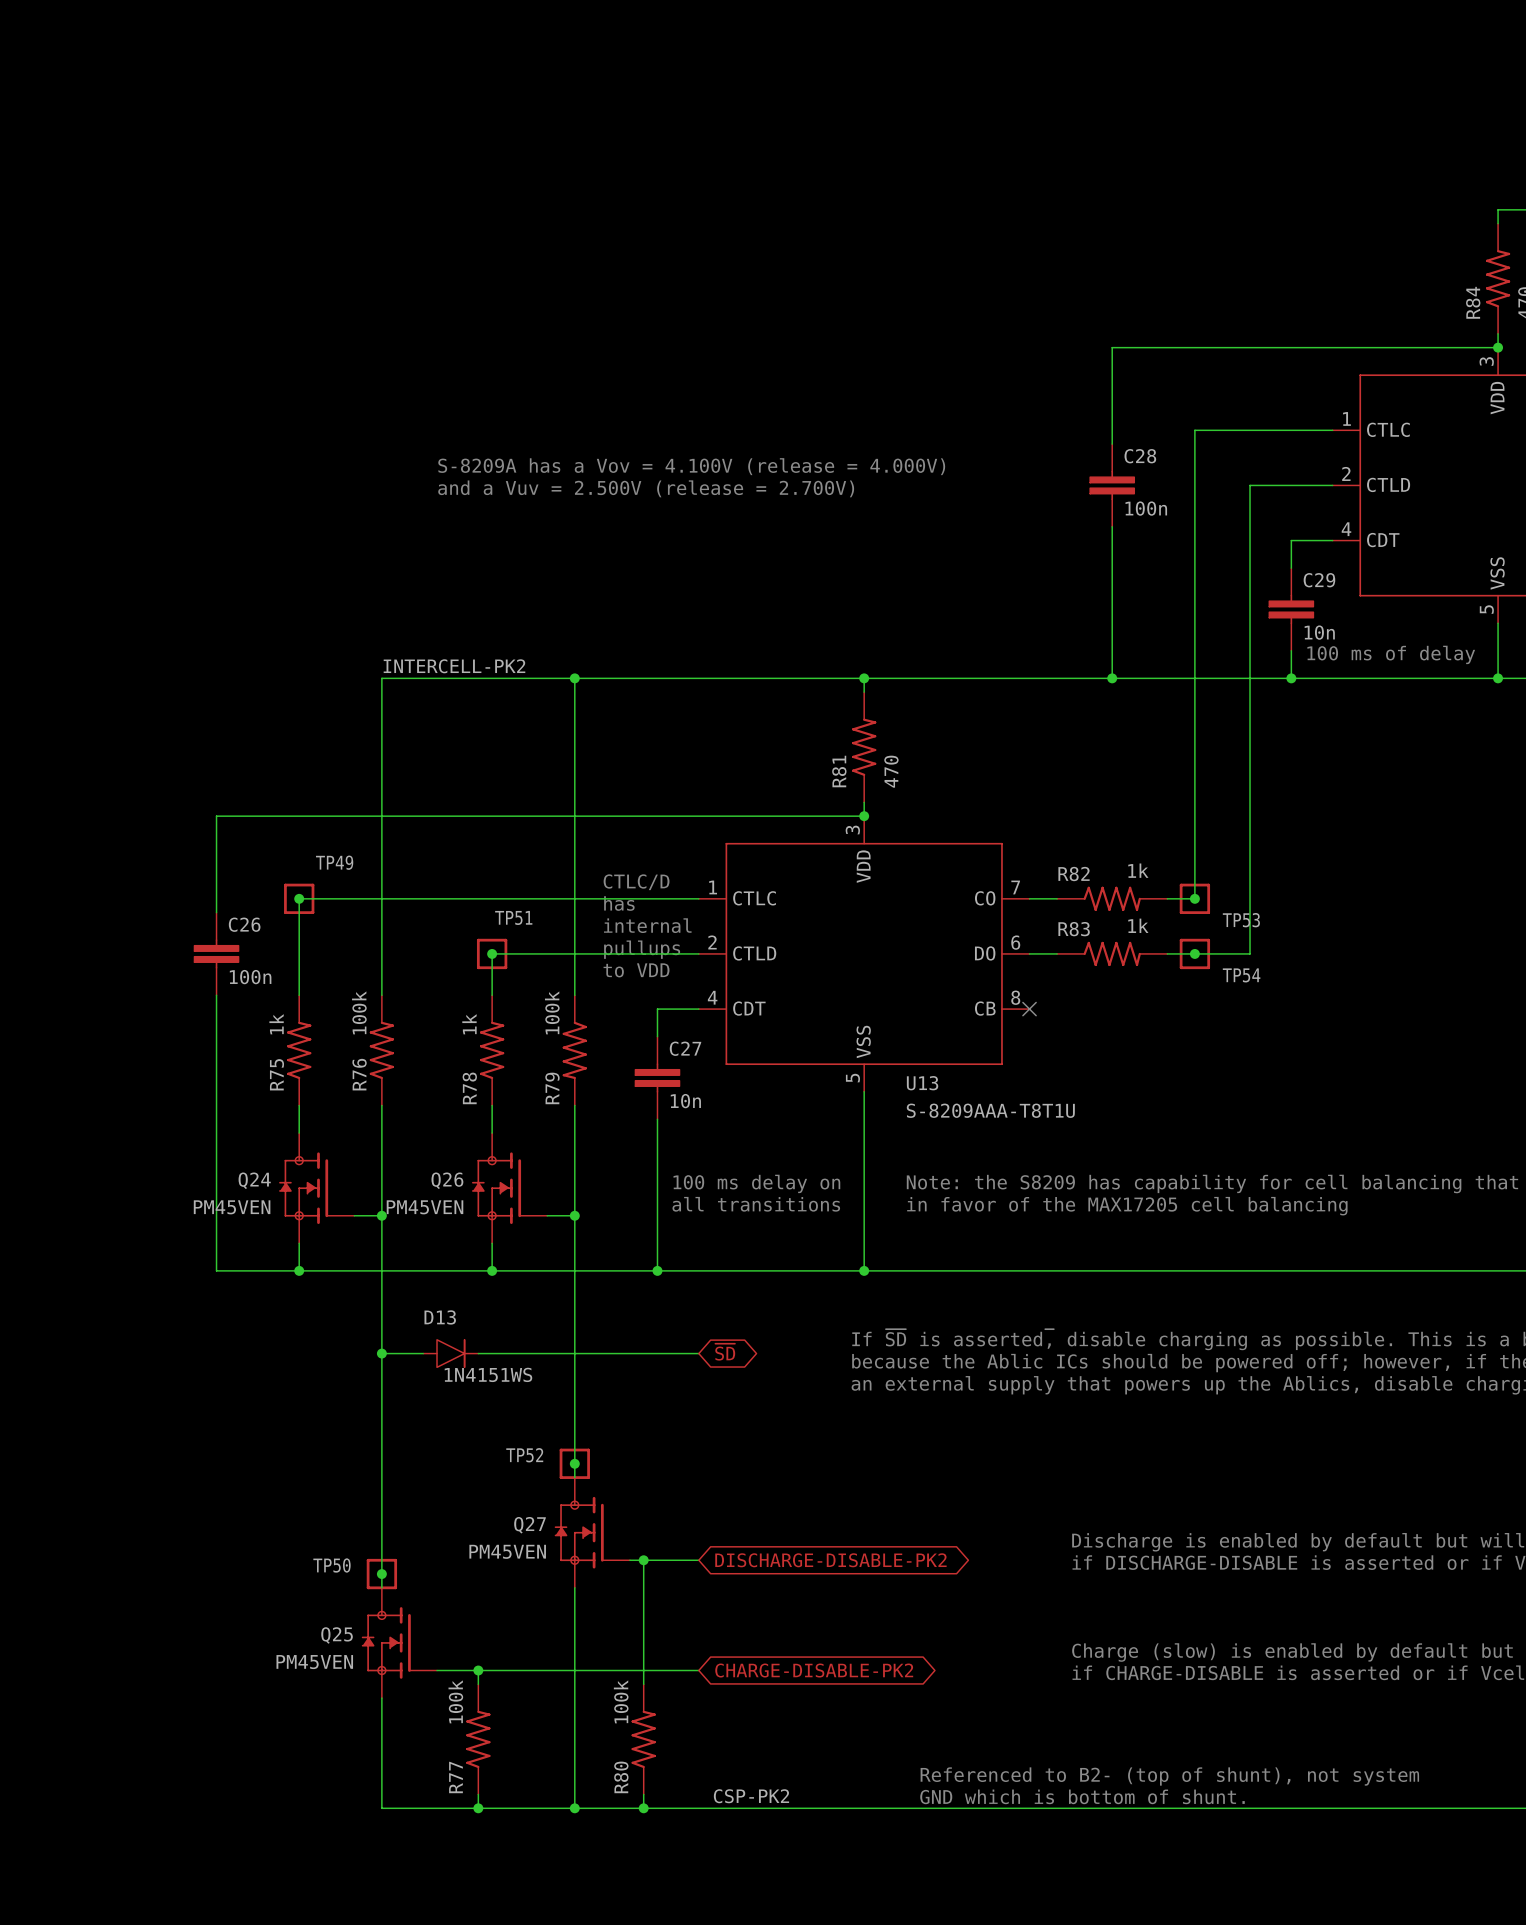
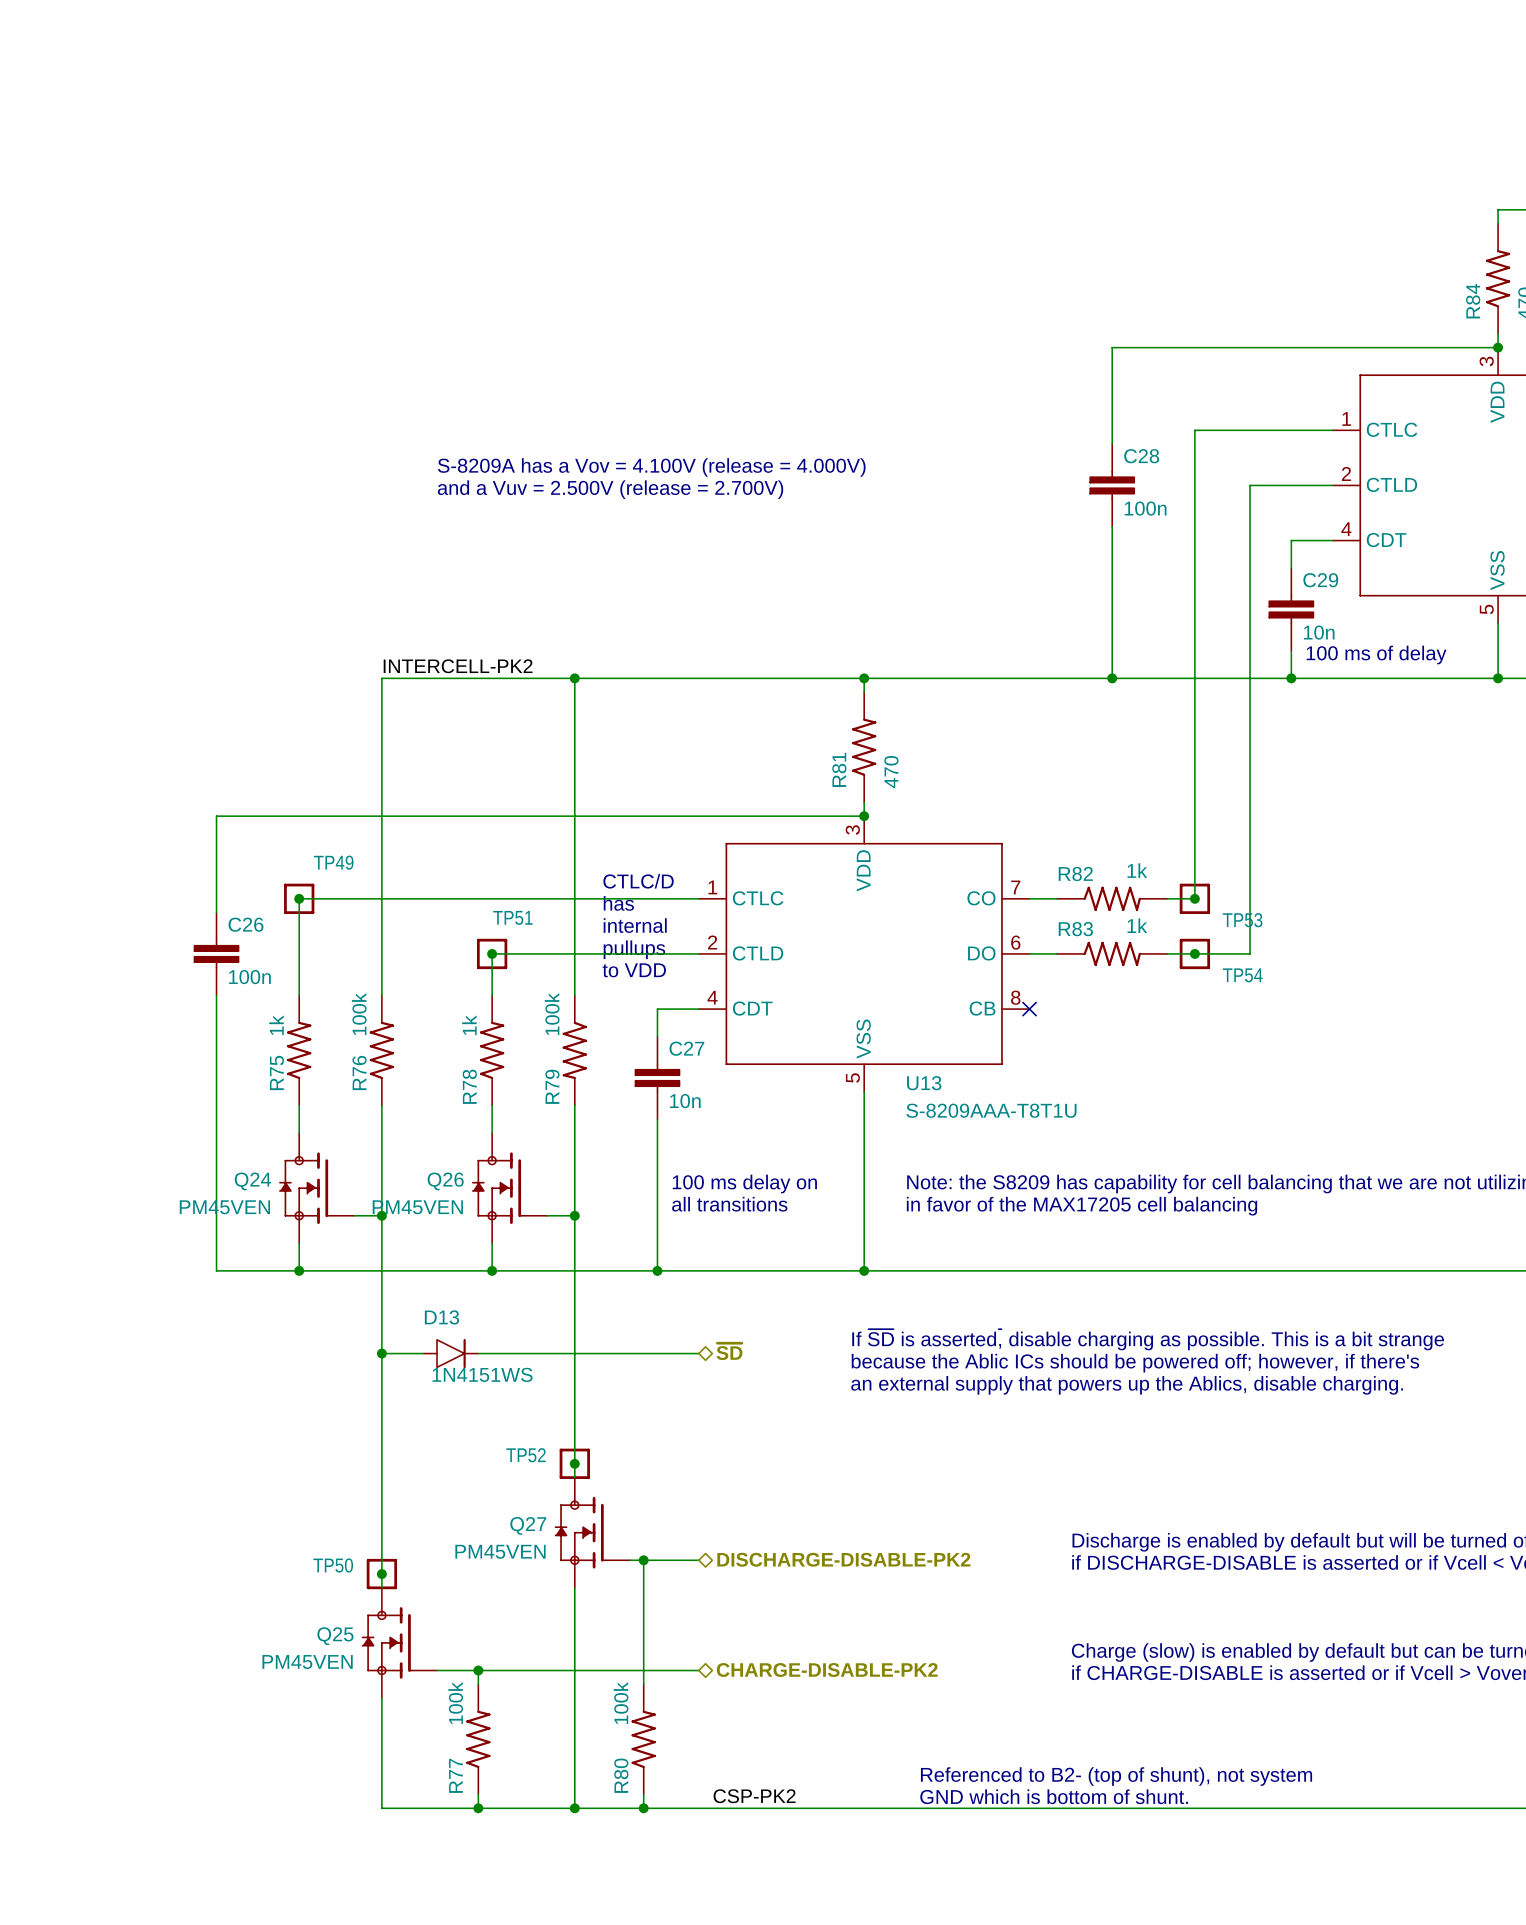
hierarchical label: none -> ~{SD} (729, 1351)
global label: ~{SD} (725, 1352) -> none
hierarchical label: none -> DISCHARGE-DISABLE-PK2 (843, 1559)
global label: DISCHARGE-DISABLE-PK2 (830, 1560) -> none
global label: CHARGE-DISABLE-PK2 (814, 1670) -> none
hierarchical label: none -> CHARGE-DISABLE-PK2 (827, 1670)

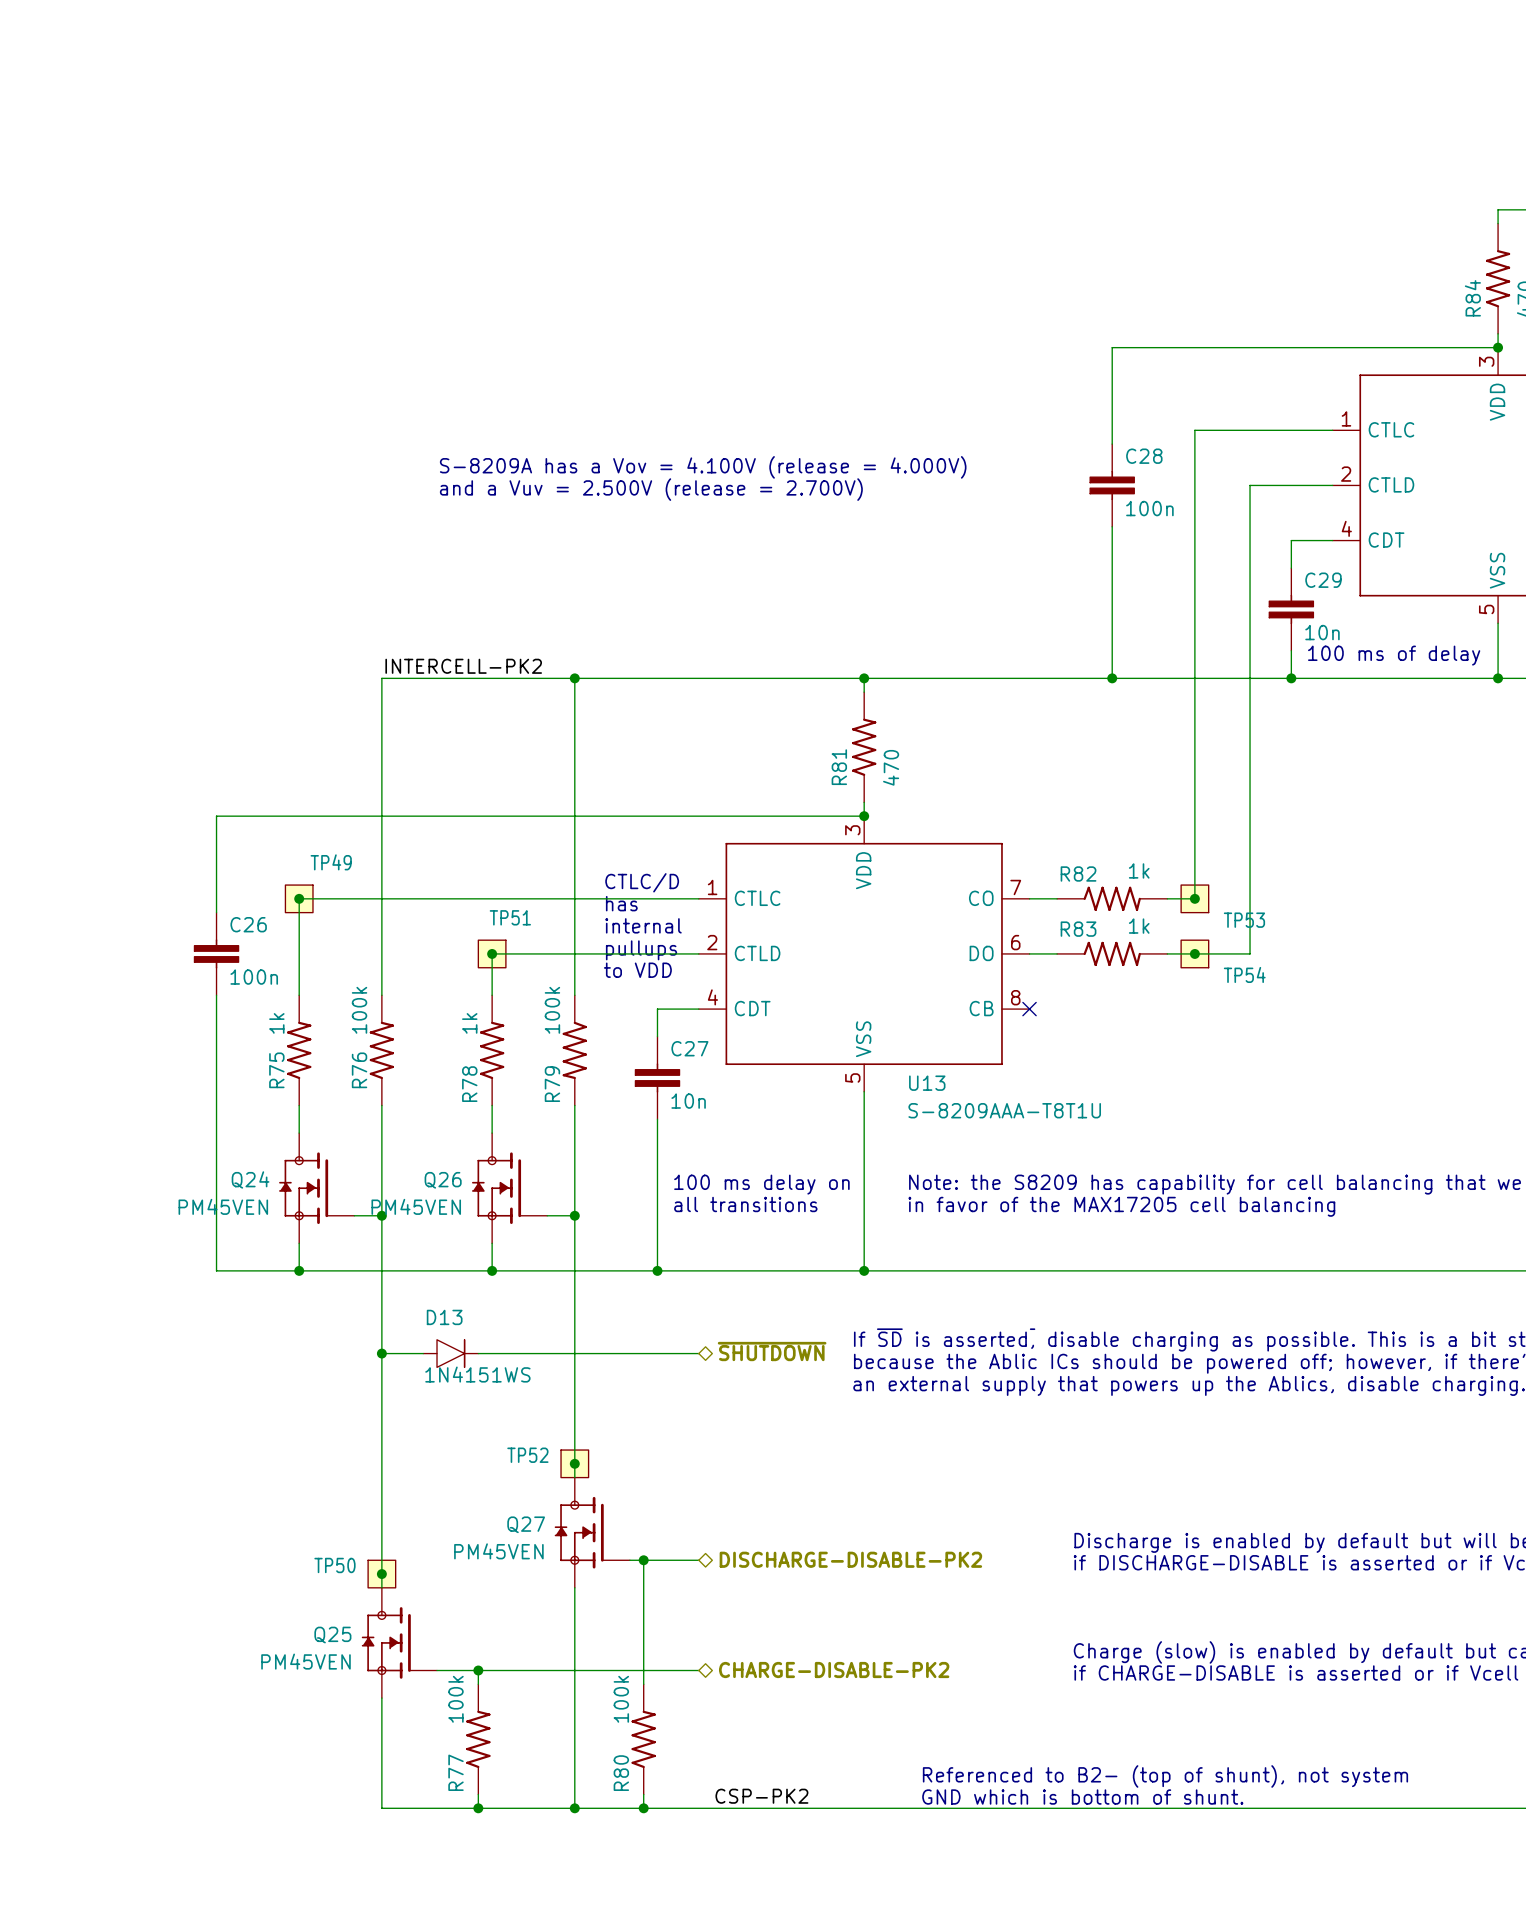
TP49 symbol: [284, 883, 315, 914] -> [285, 885, 313, 913]
TP53 symbol: [1179, 883, 1211, 914] -> [1181, 885, 1209, 913]
TP51 symbol: [476, 938, 508, 970] -> [478, 940, 506, 968]
TP54 symbol: [1179, 938, 1211, 970] -> [1181, 940, 1209, 968]
hierarchical label: ~{SD} (729, 1351) -> ~{SHUTDOWN} (772, 1351)
TP52 symbol: [559, 1448, 590, 1479] -> [561, 1450, 589, 1478]
TP50 symbol: [366, 1558, 398, 1590] -> [368, 1560, 396, 1588]

